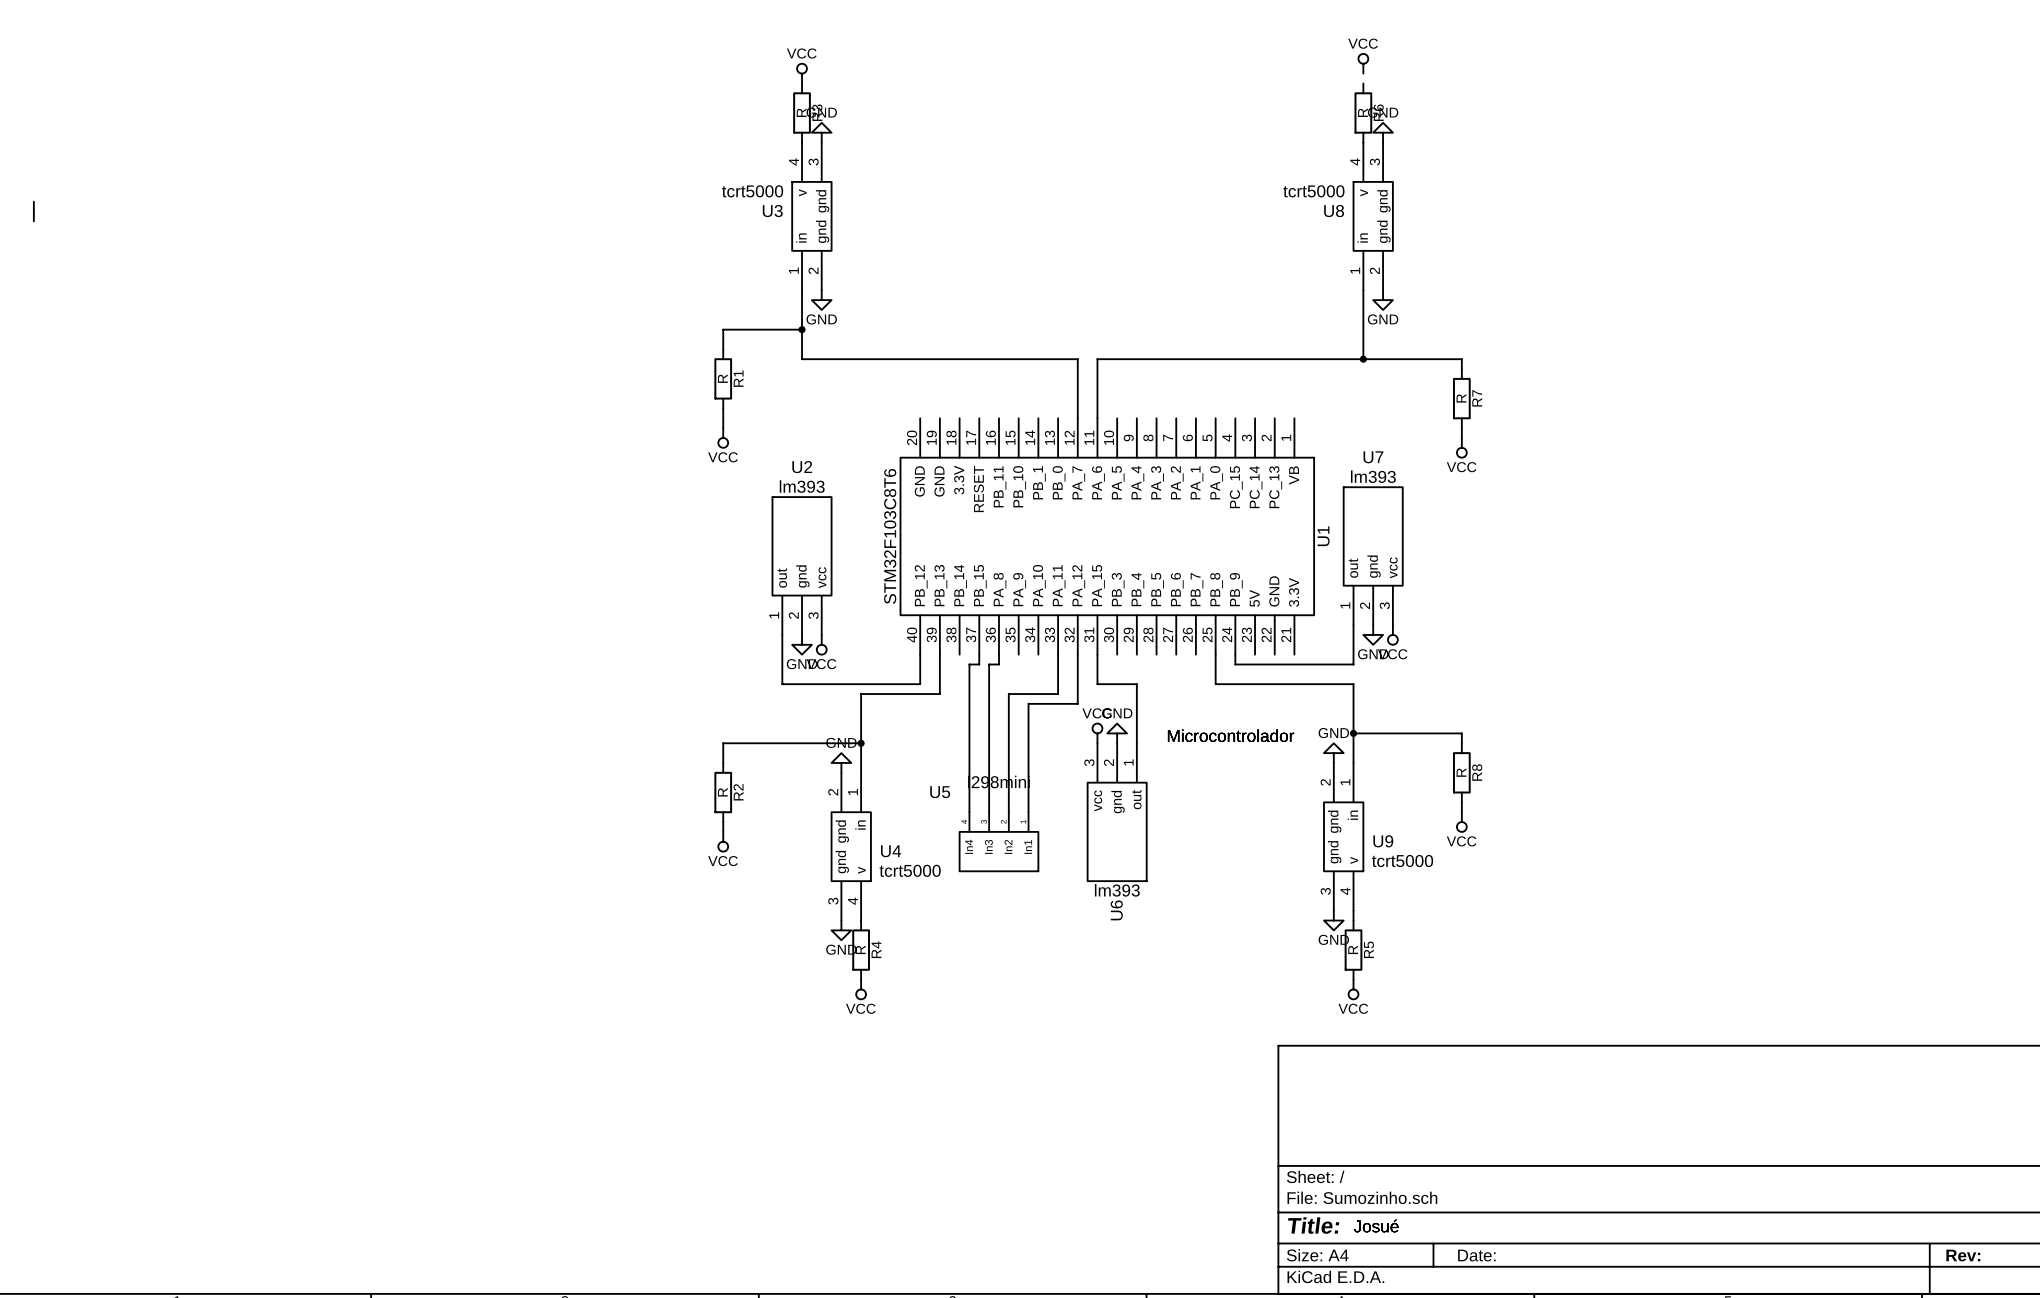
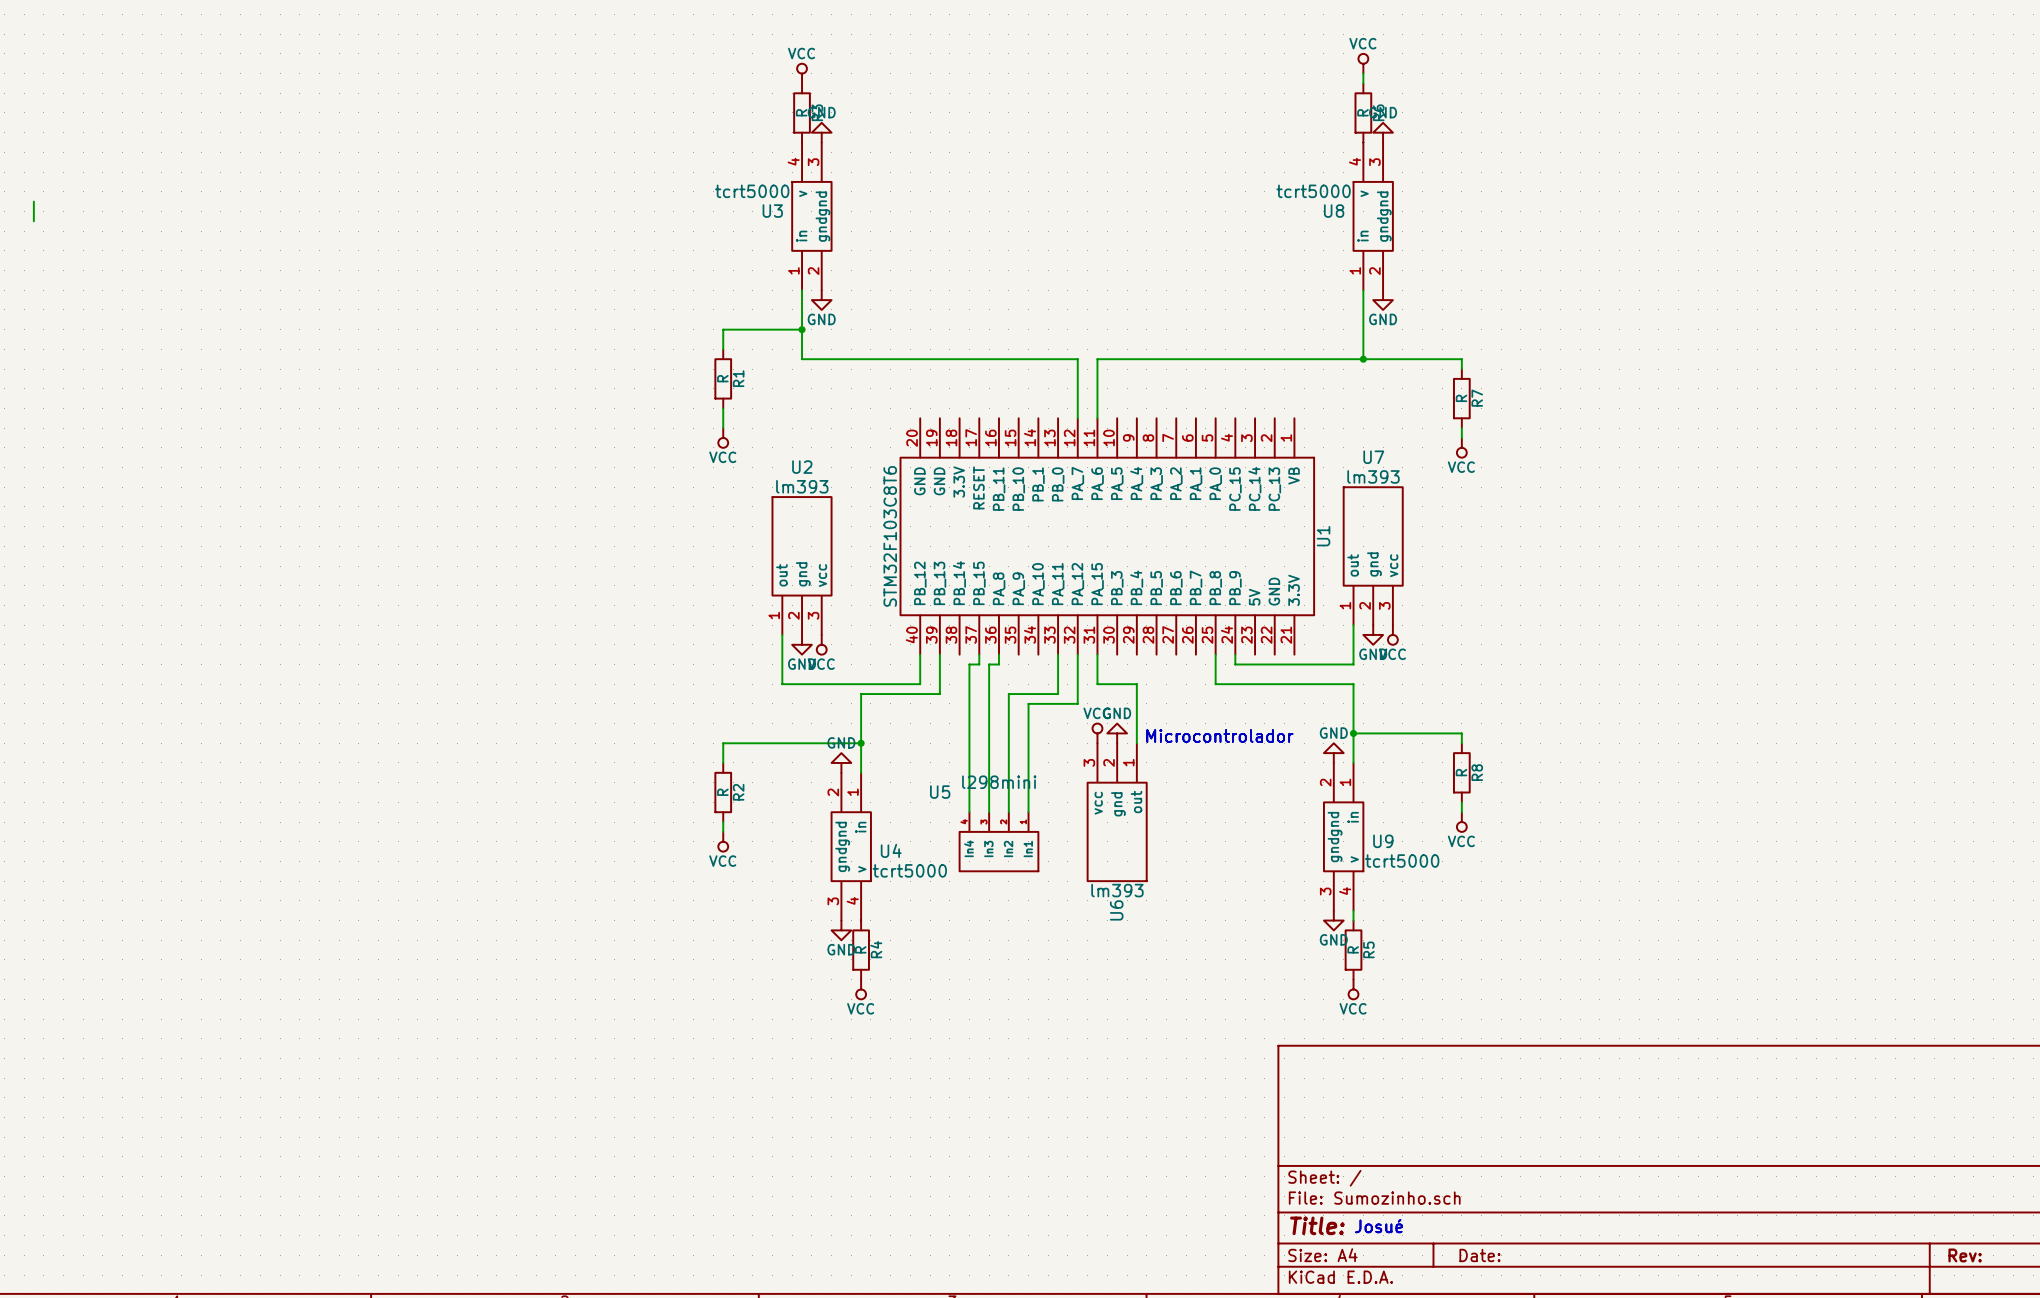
wire: none -> (1363, 73) (1363, 83)

